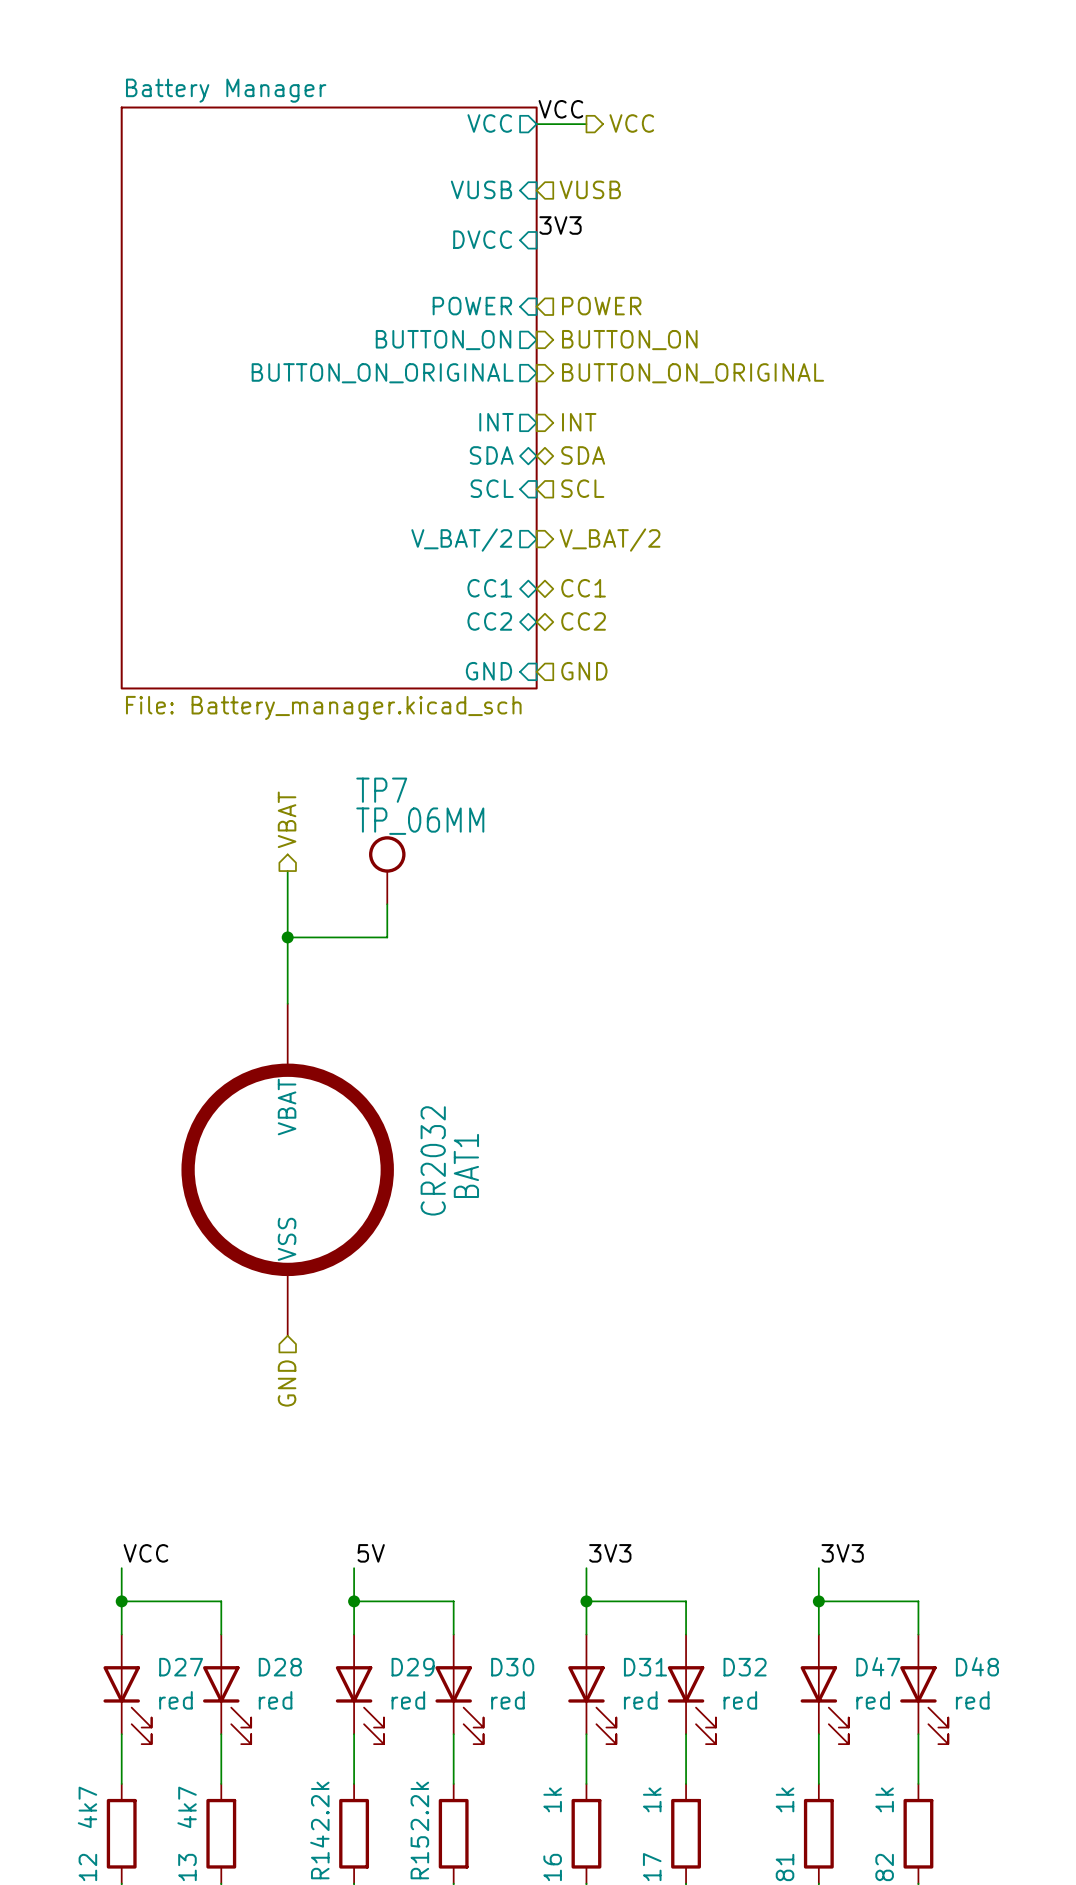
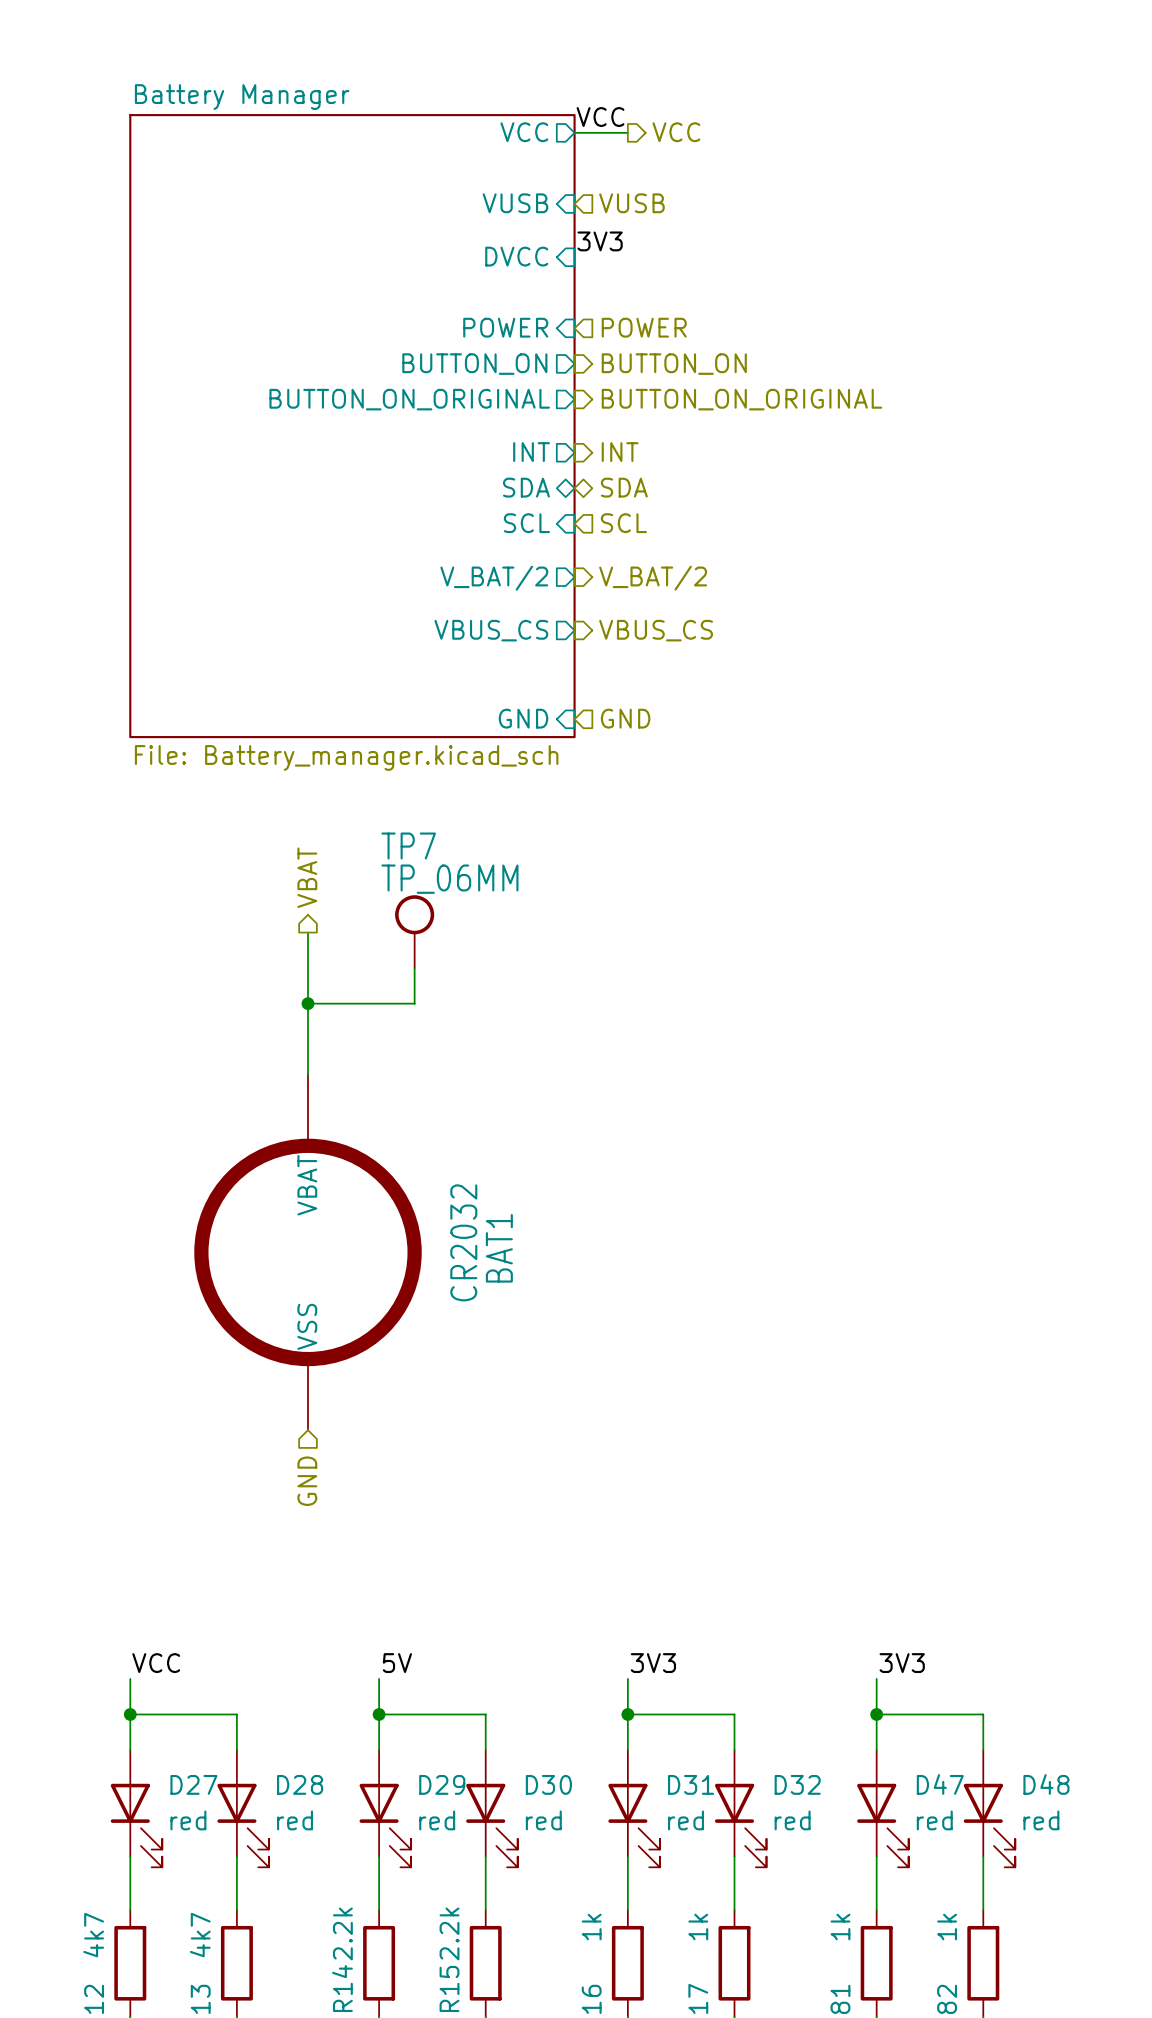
sheet pin shape: bidirectional (489, 588) -> output (491, 630)
sheet pin: CC1 (489, 588) -> VBUS_CS (491, 630)
hierarchical label shape: bidirectional (583, 588) -> output (656, 630)
hierarchical label: CC1 (583, 588) -> VBUS_CS (656, 630)
sheet pin: CC2 (489, 621) -> none
hierarchical label: CC2 (583, 621) -> none

